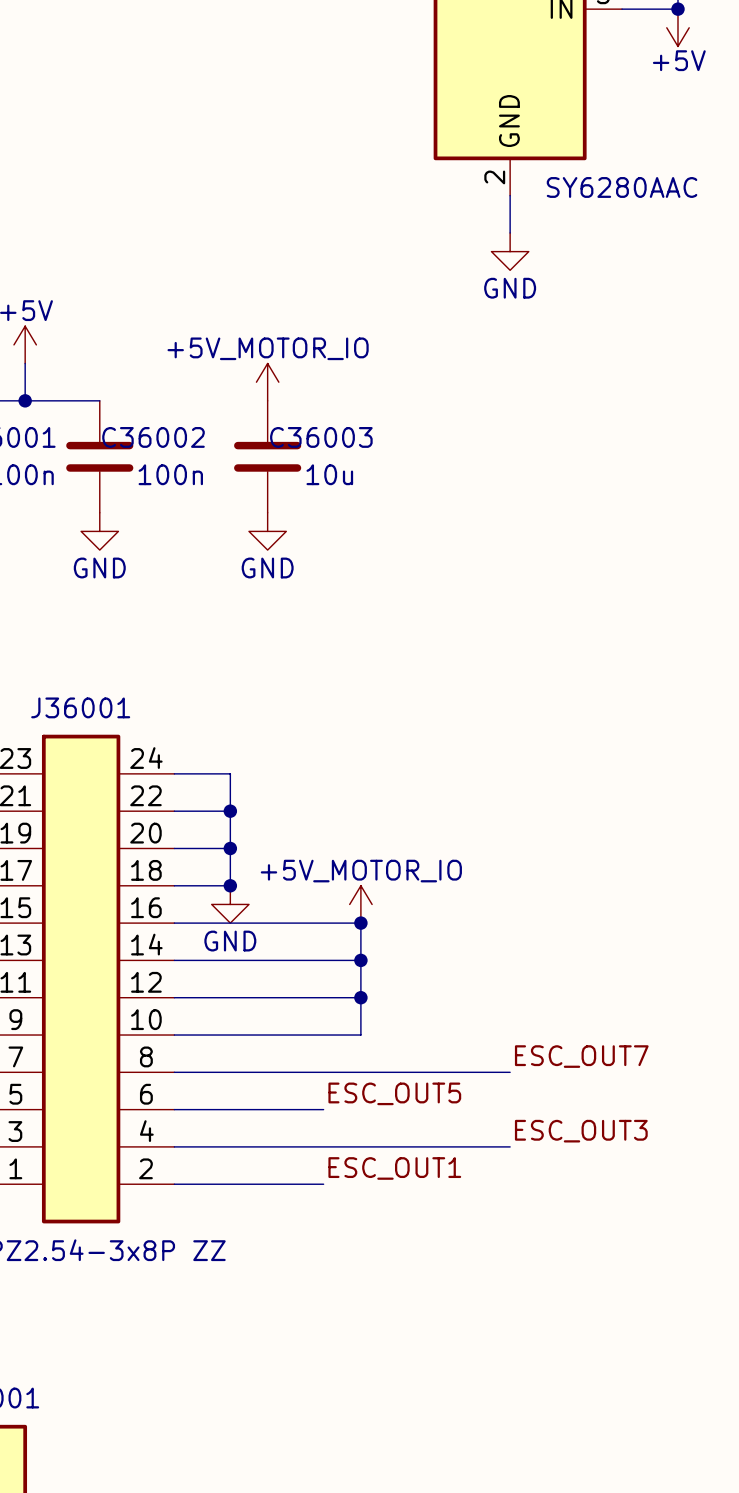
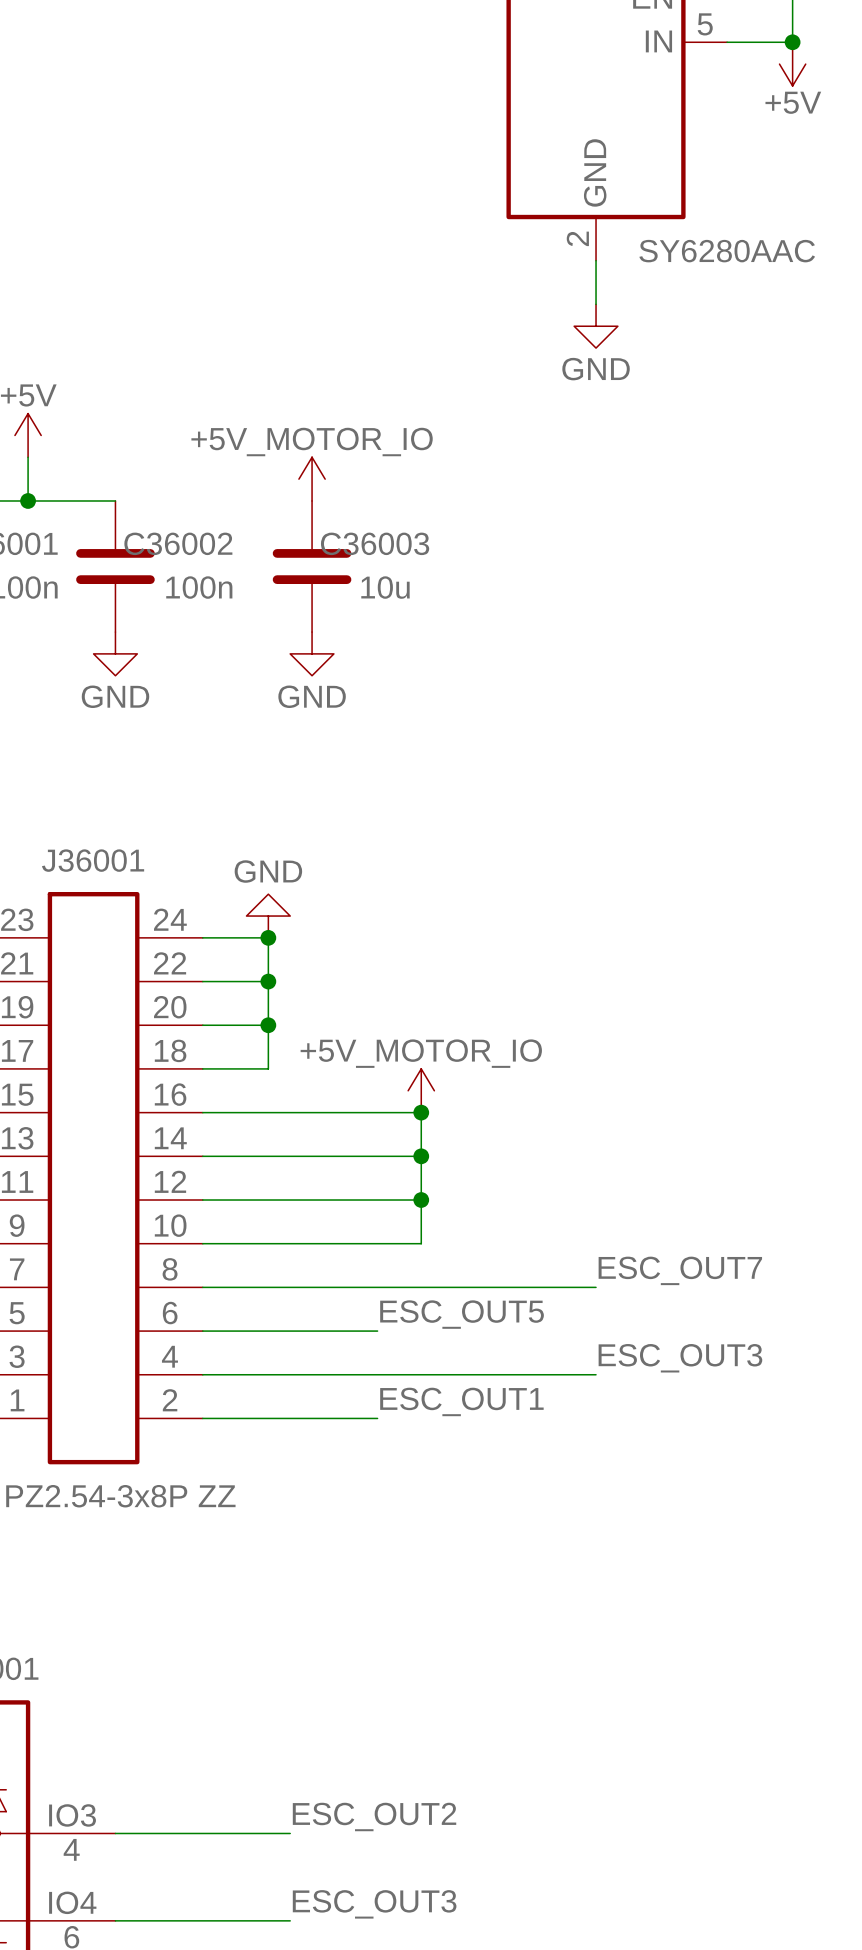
junction: none -> (268, 937)
junction: (230, 885) -> none
power symbol rotation: 0° (230, 904) -> 180° (268, 916)
power symbol position: GND (230, 904) -> GND (268, 916)

